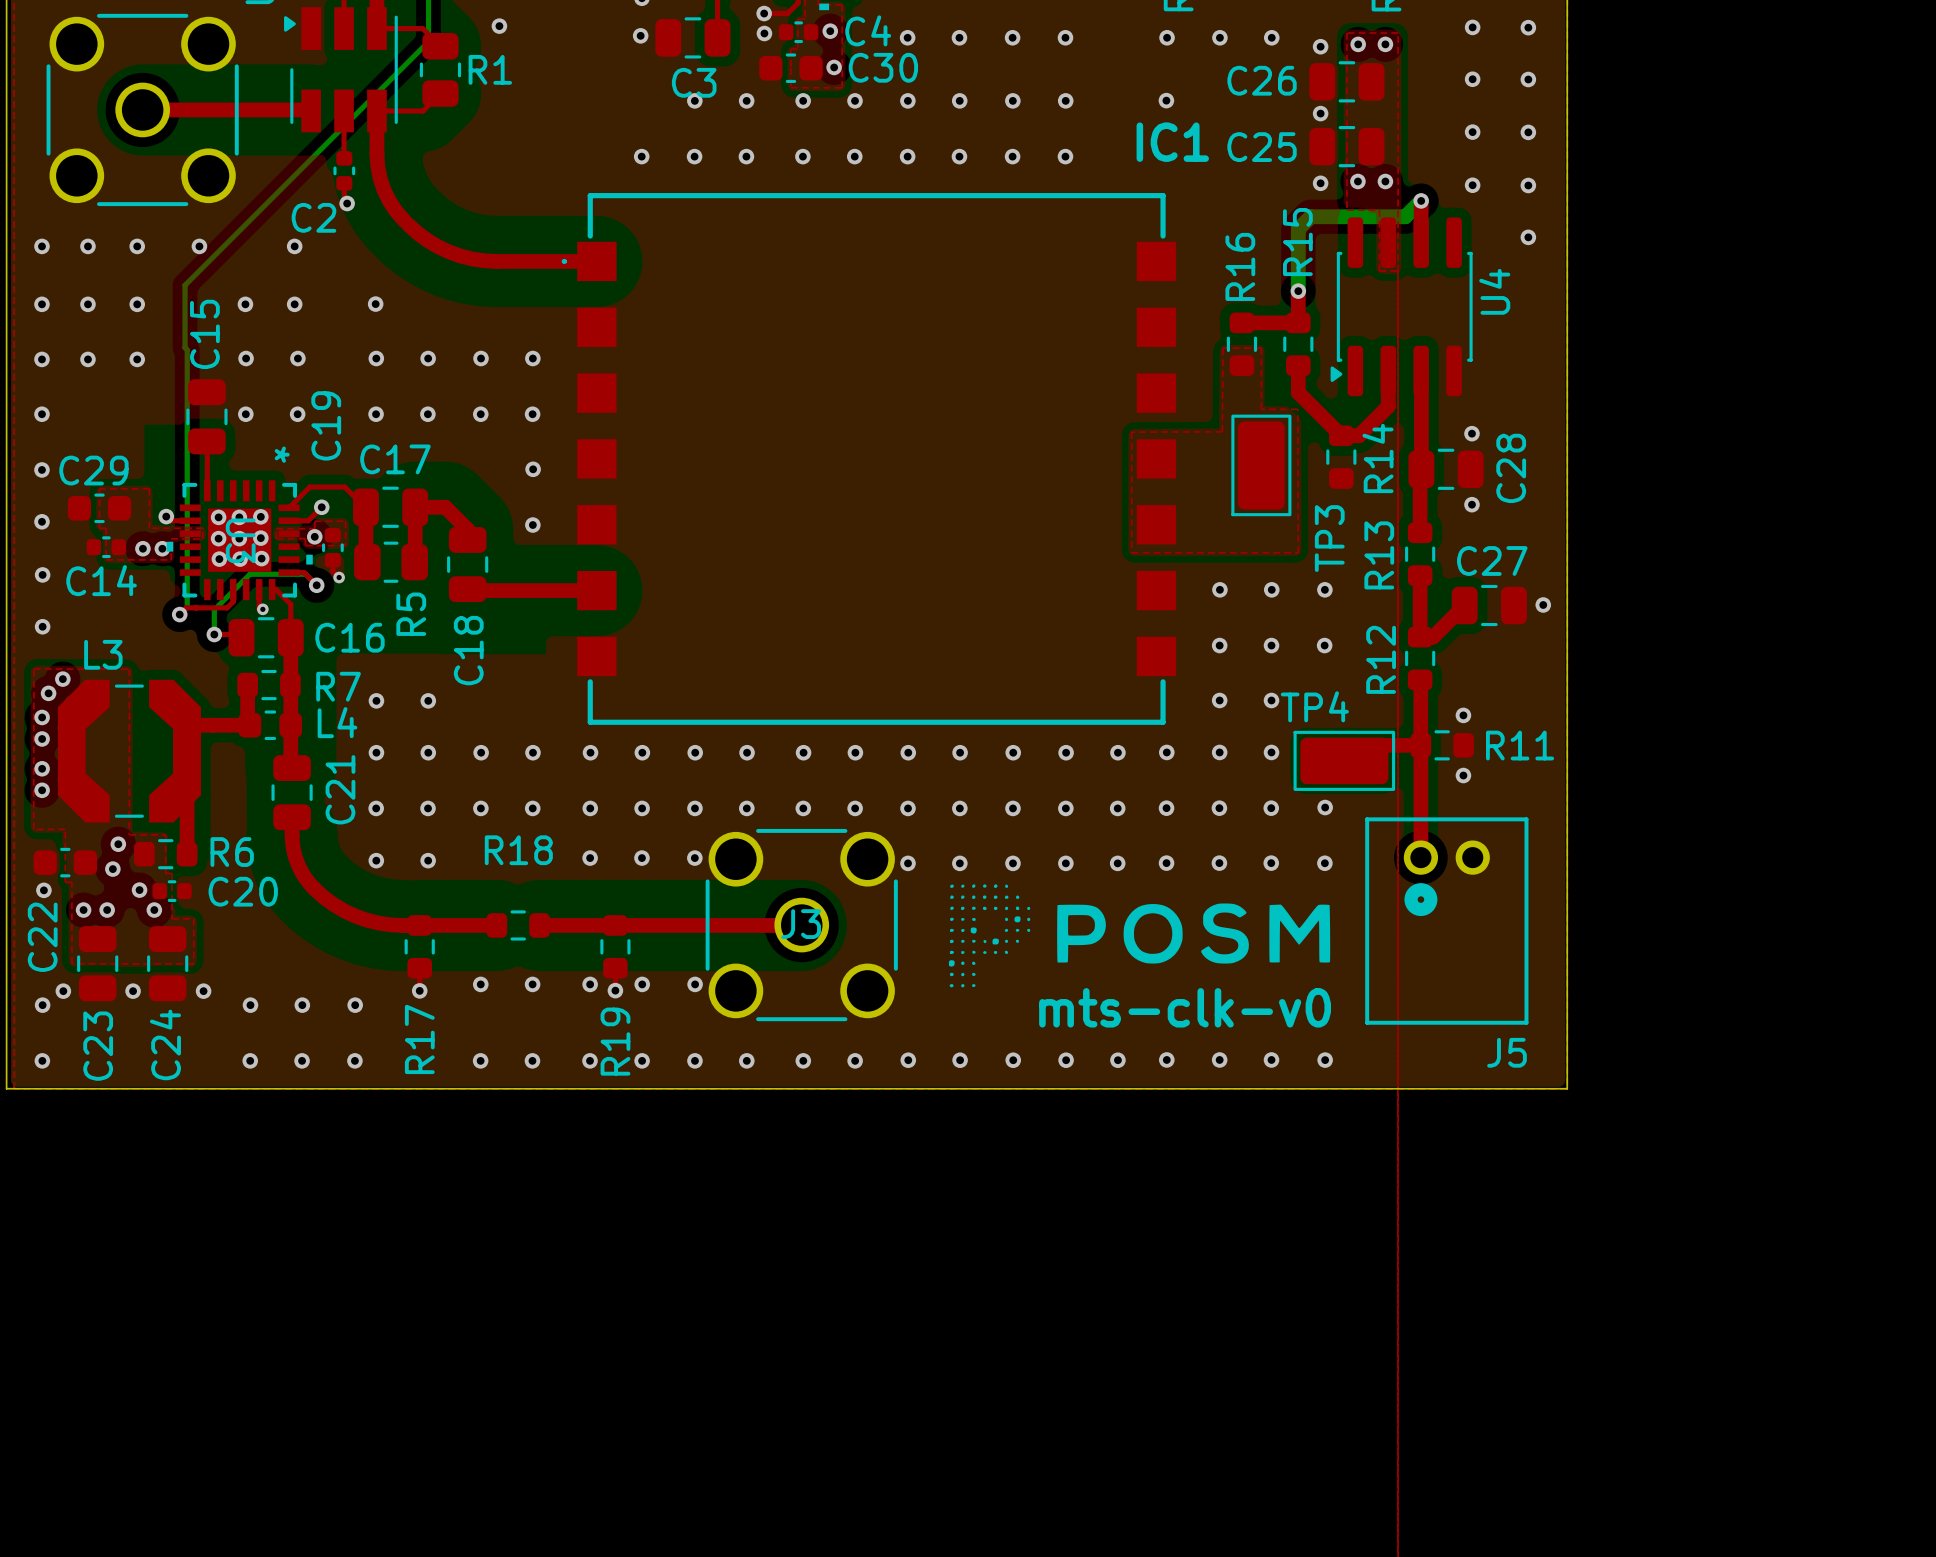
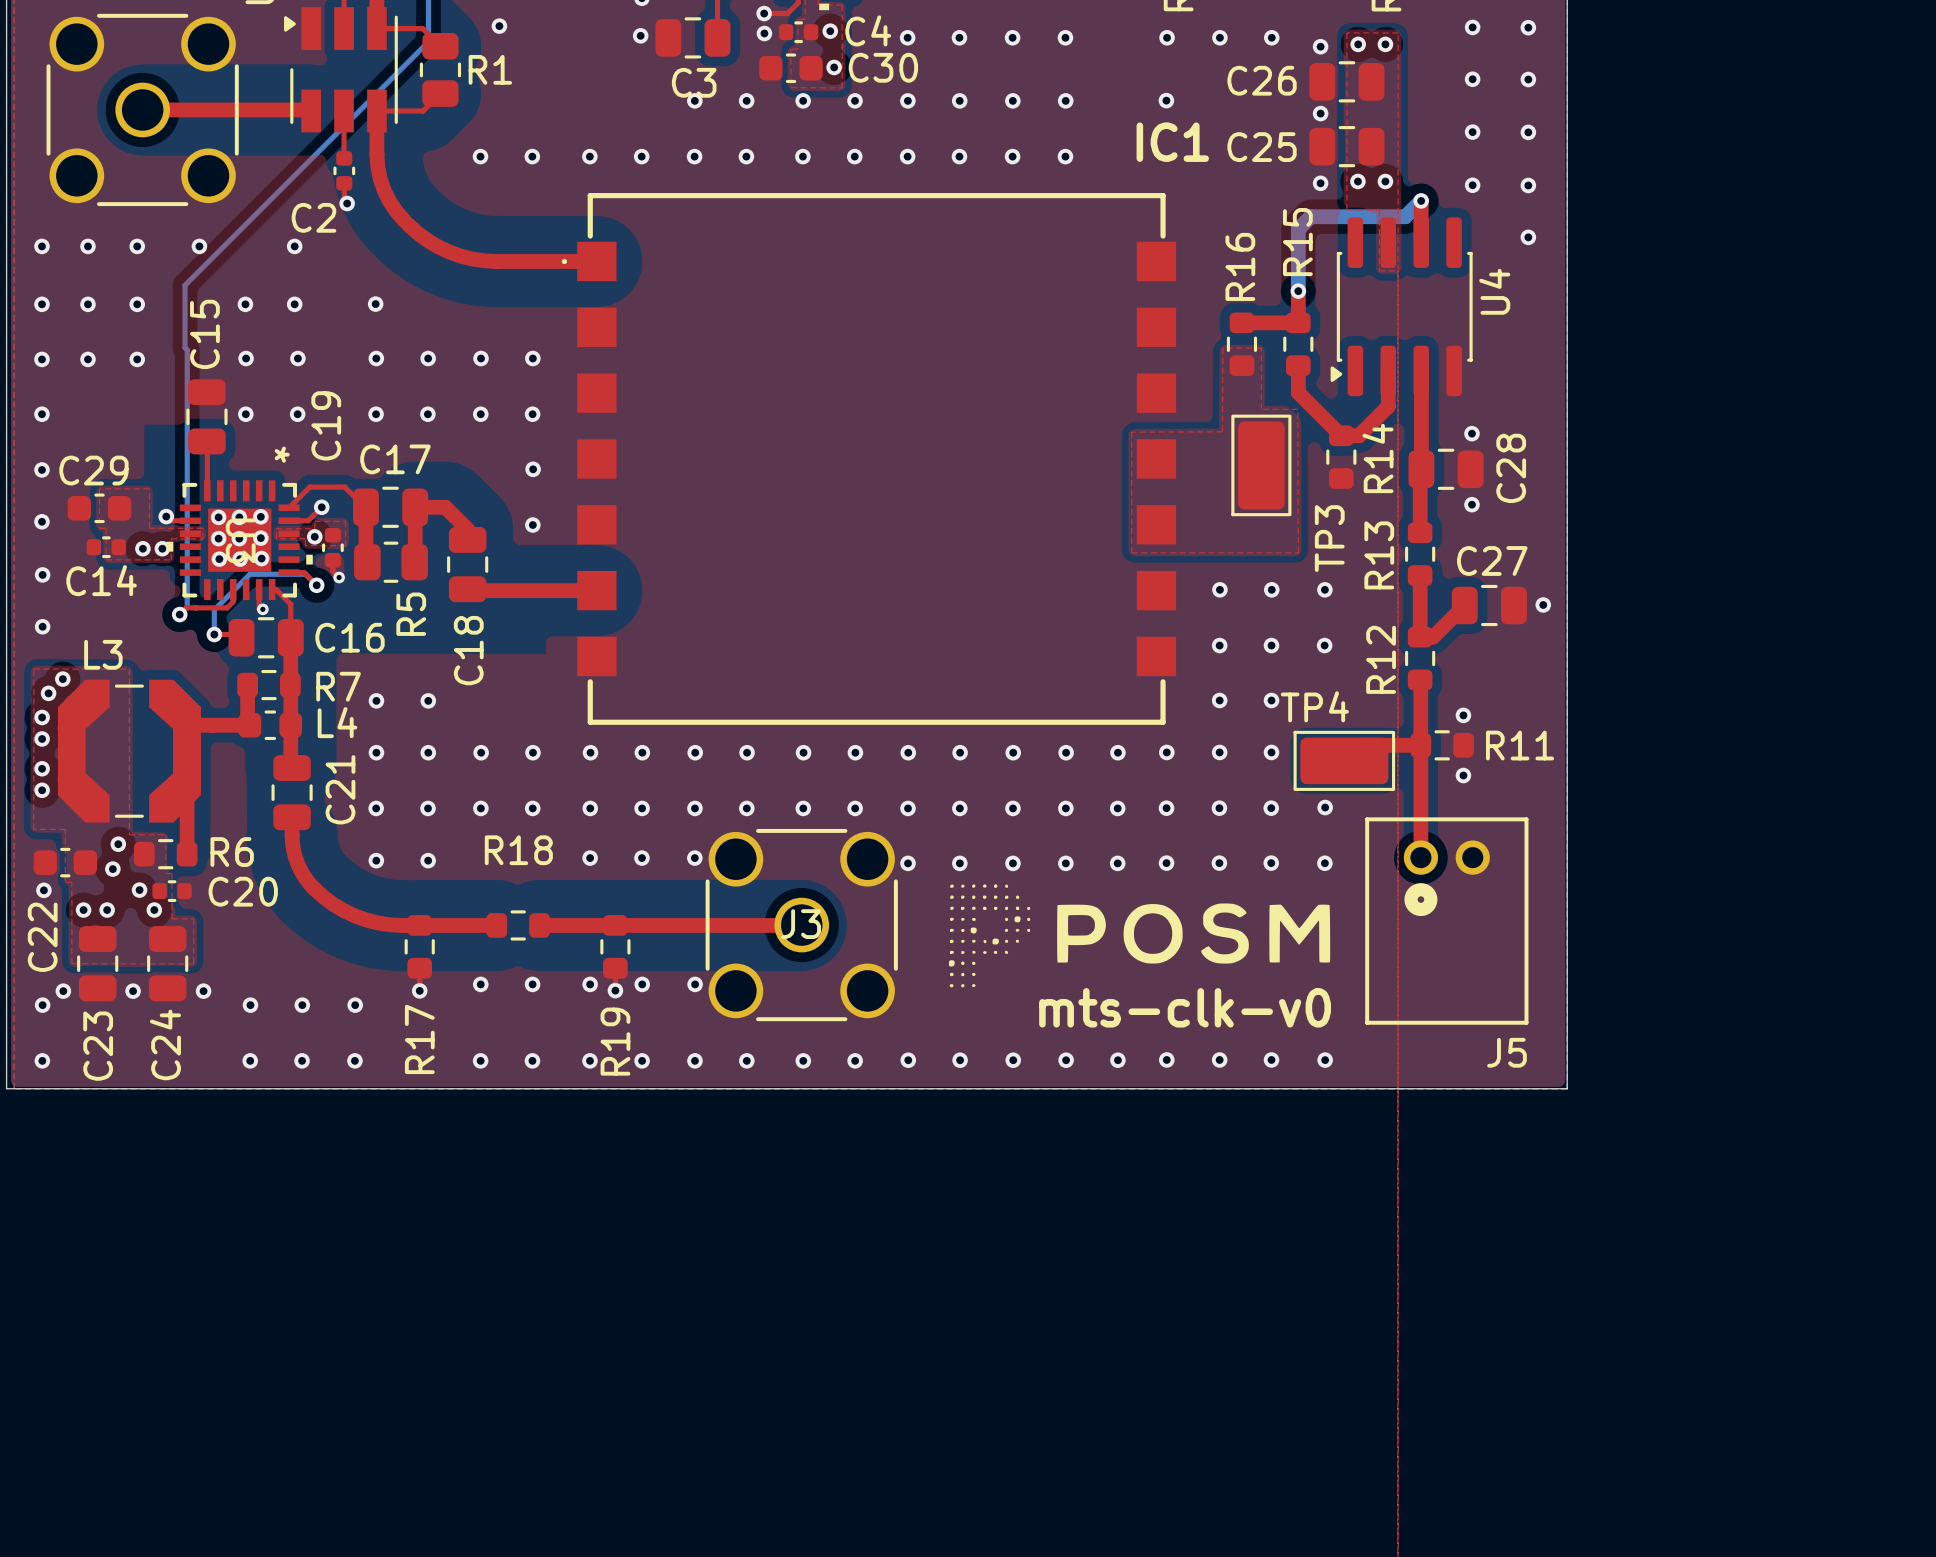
via: none -> (480, 156)
via: none -> (532, 156)
via: none -> (589, 156)

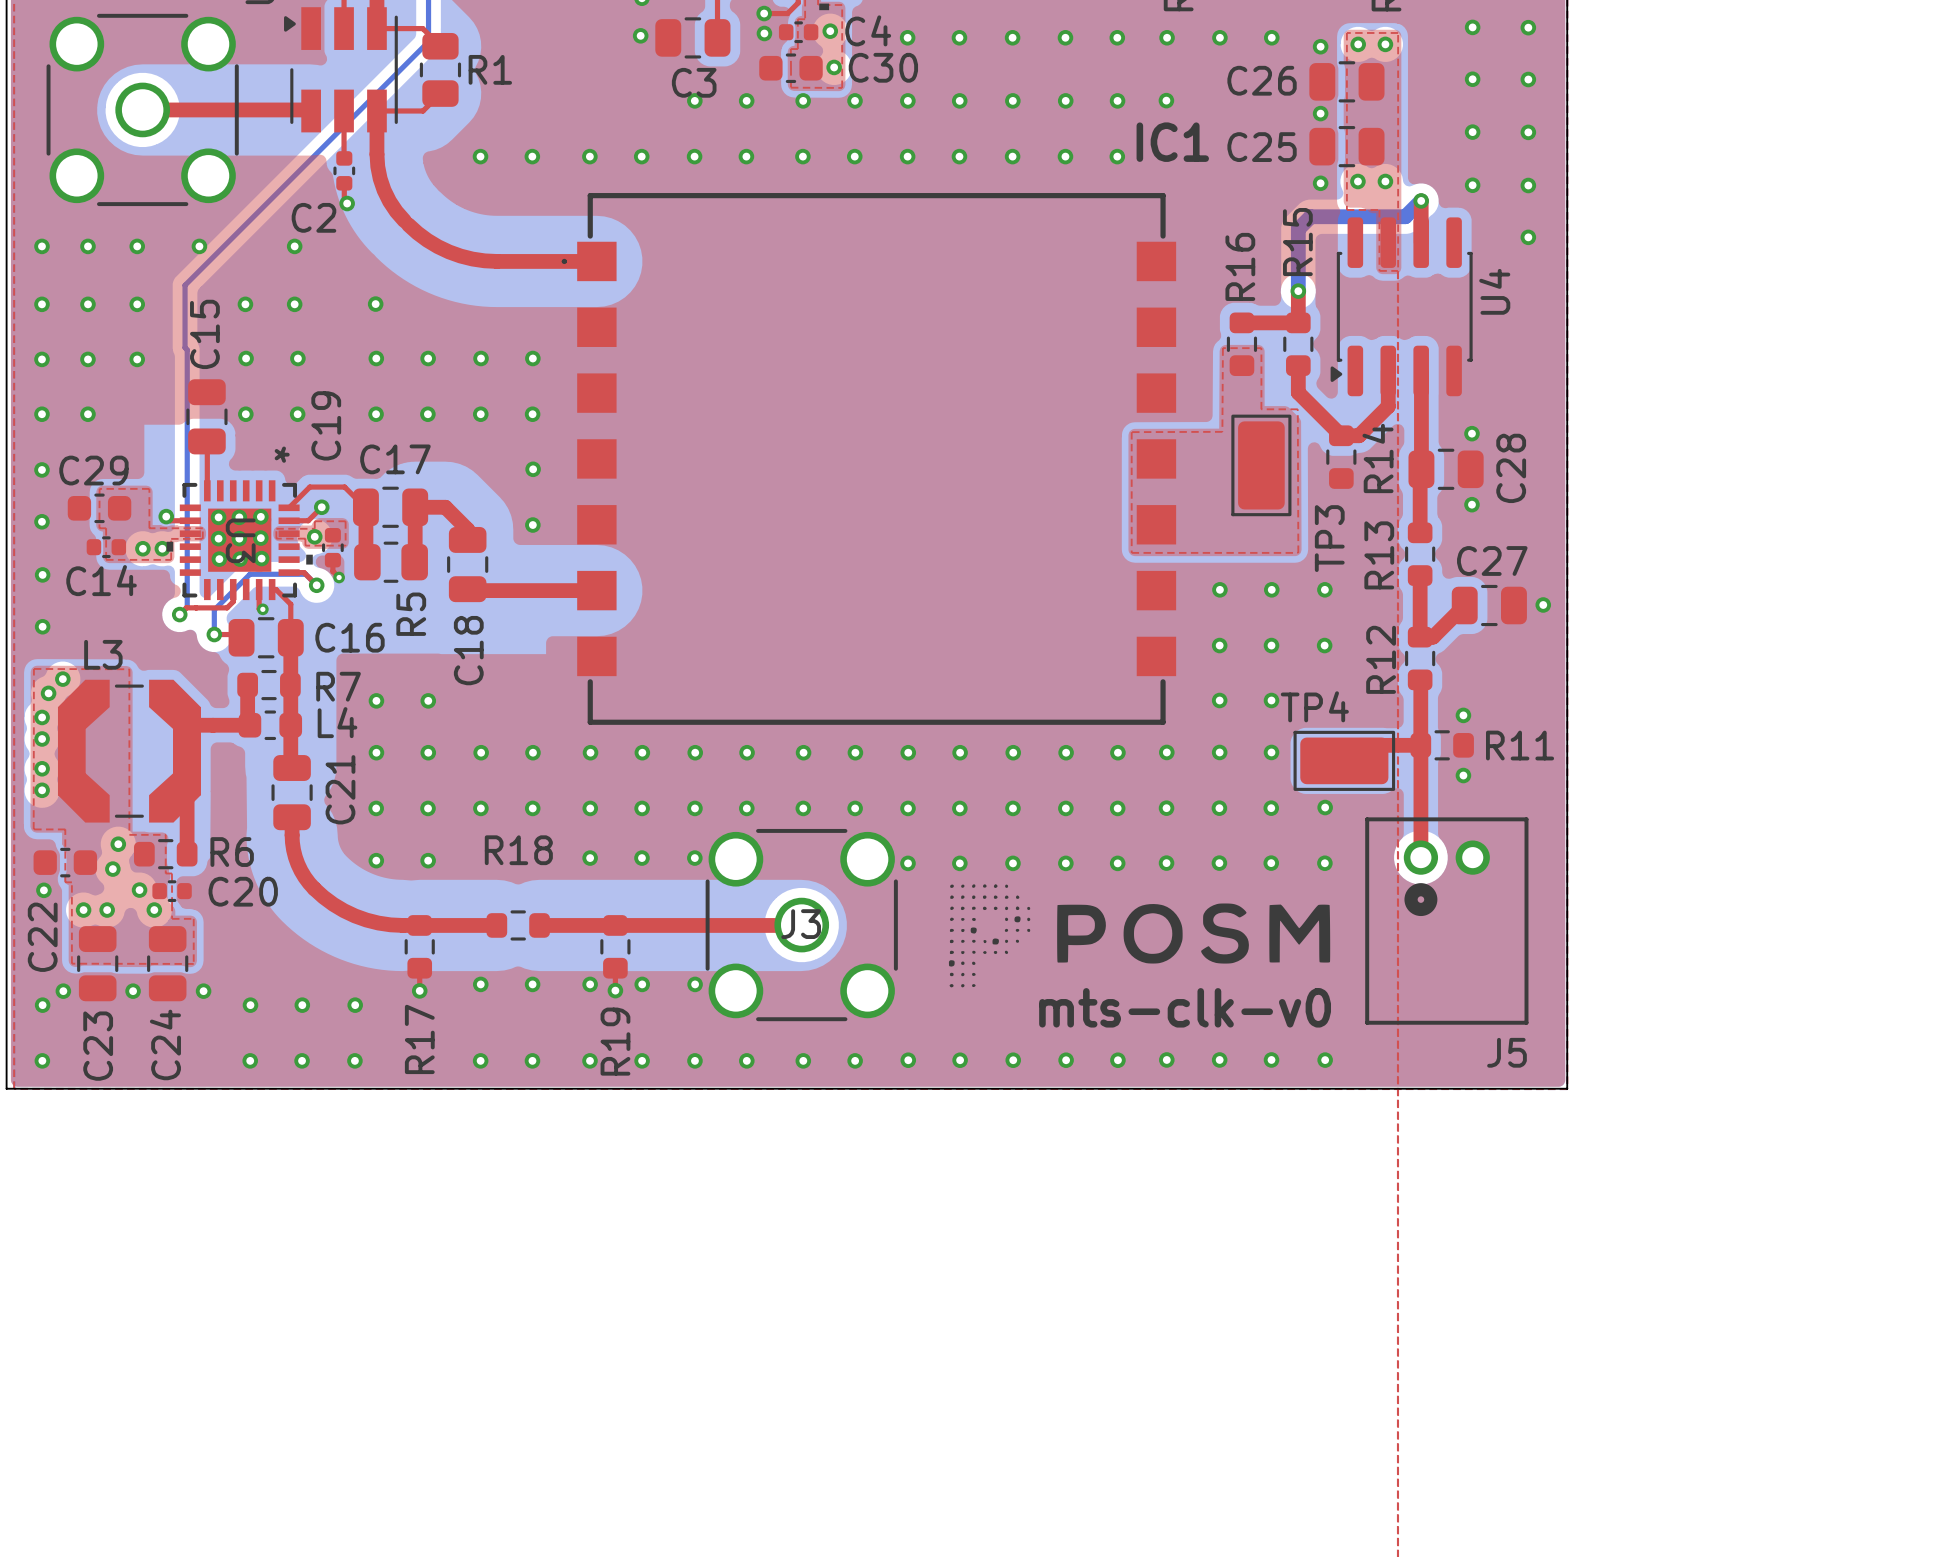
via: (499, 26) -> none
via: none -> (1117, 37)
via: none -> (1117, 100)
via: none -> (1117, 156)
via: none -> (87, 414)

